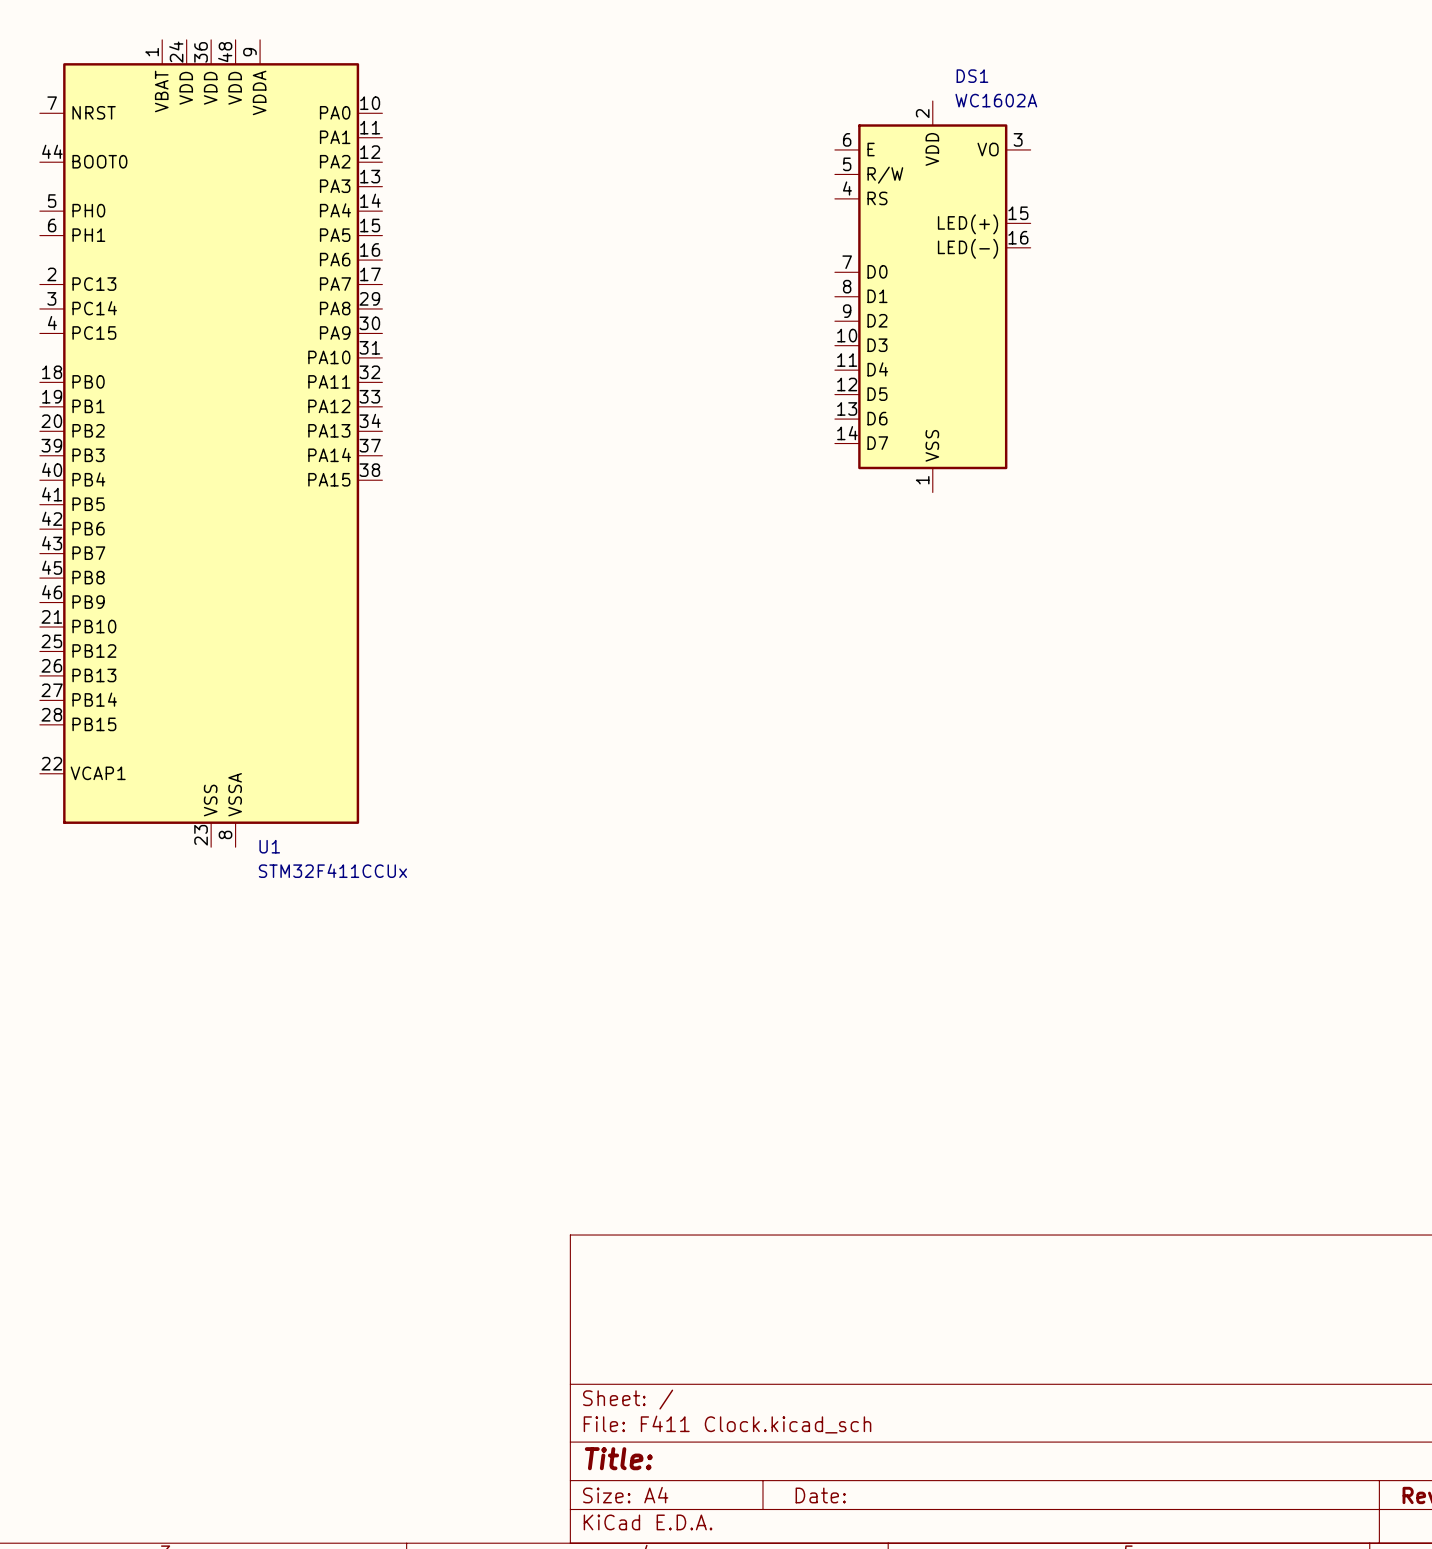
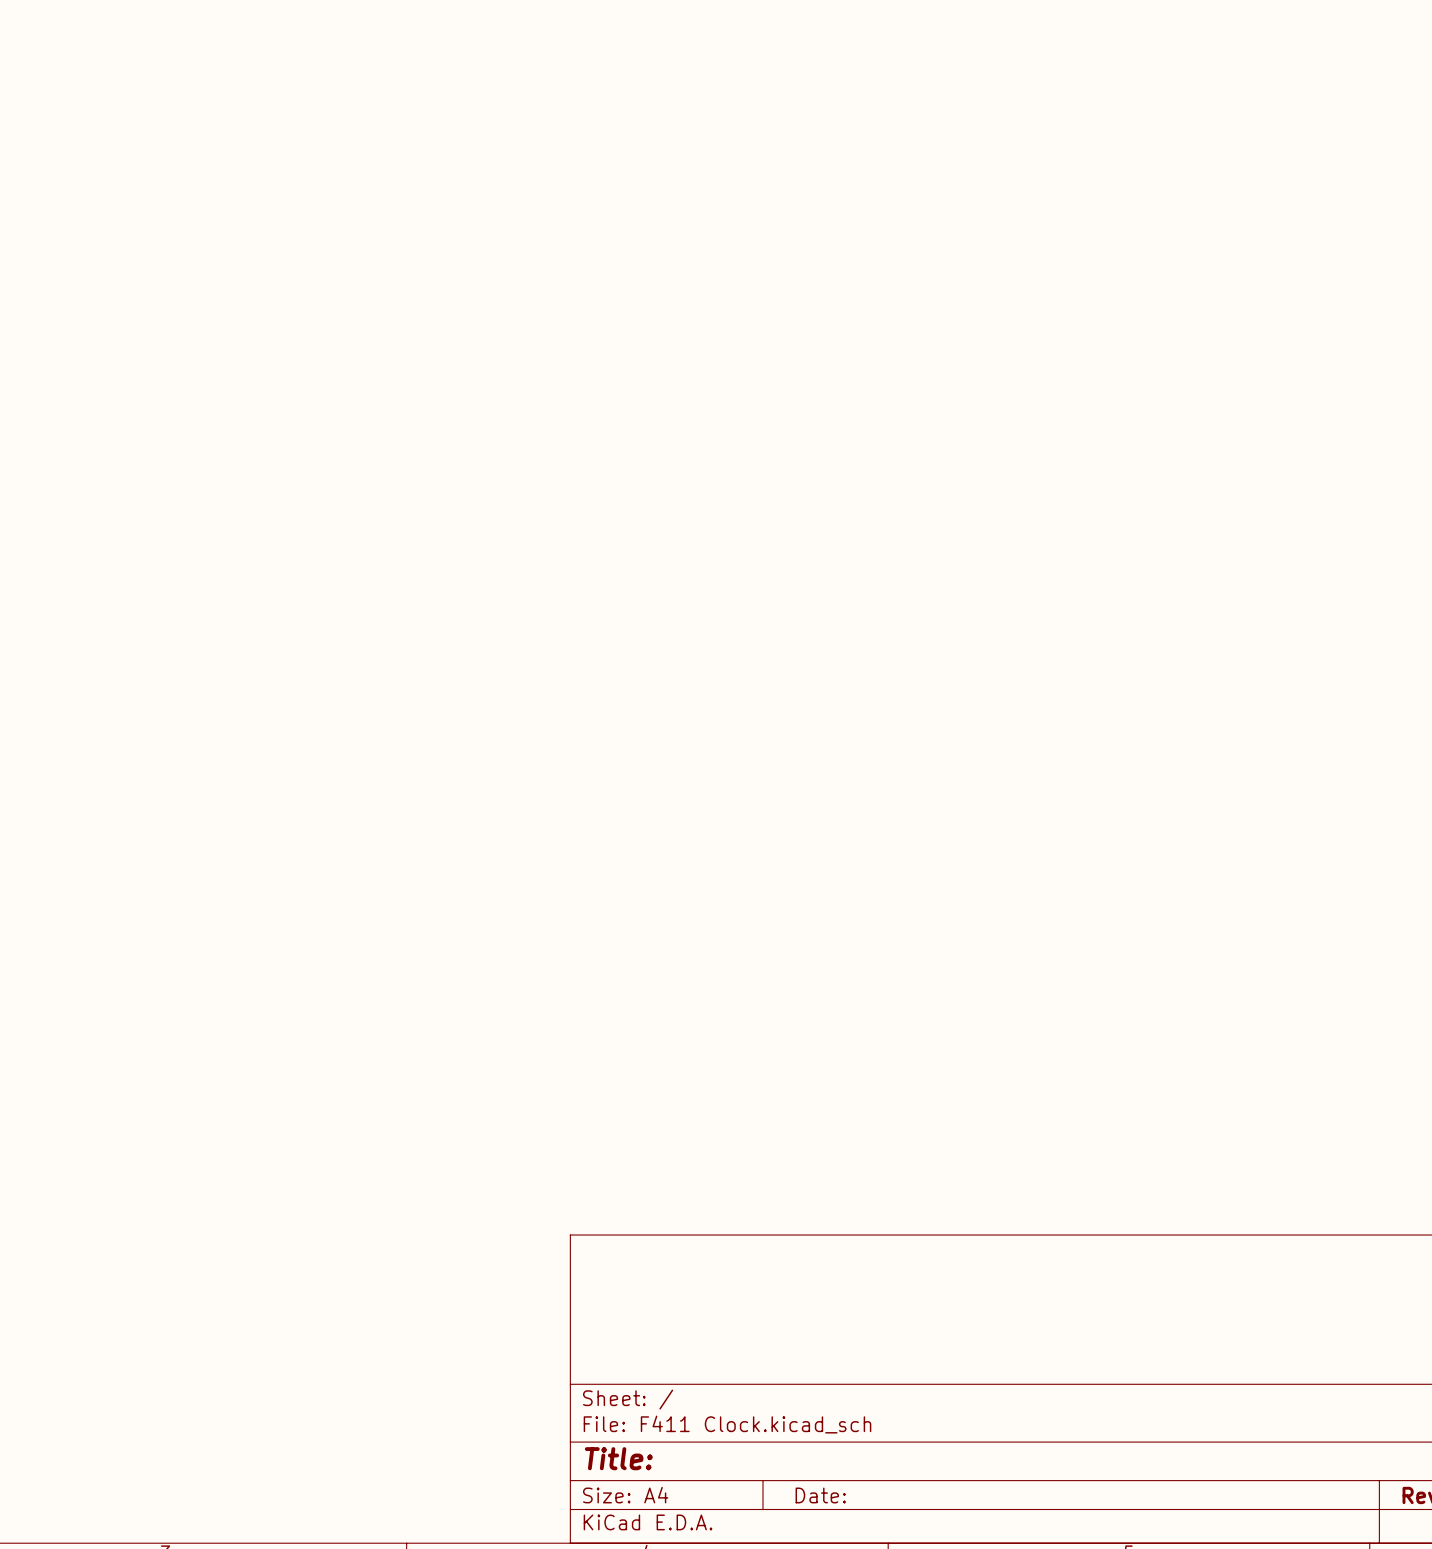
DS1: WC1602A (932, 296) -> none
U1: STM32F411CCUx (211, 443) -> none

